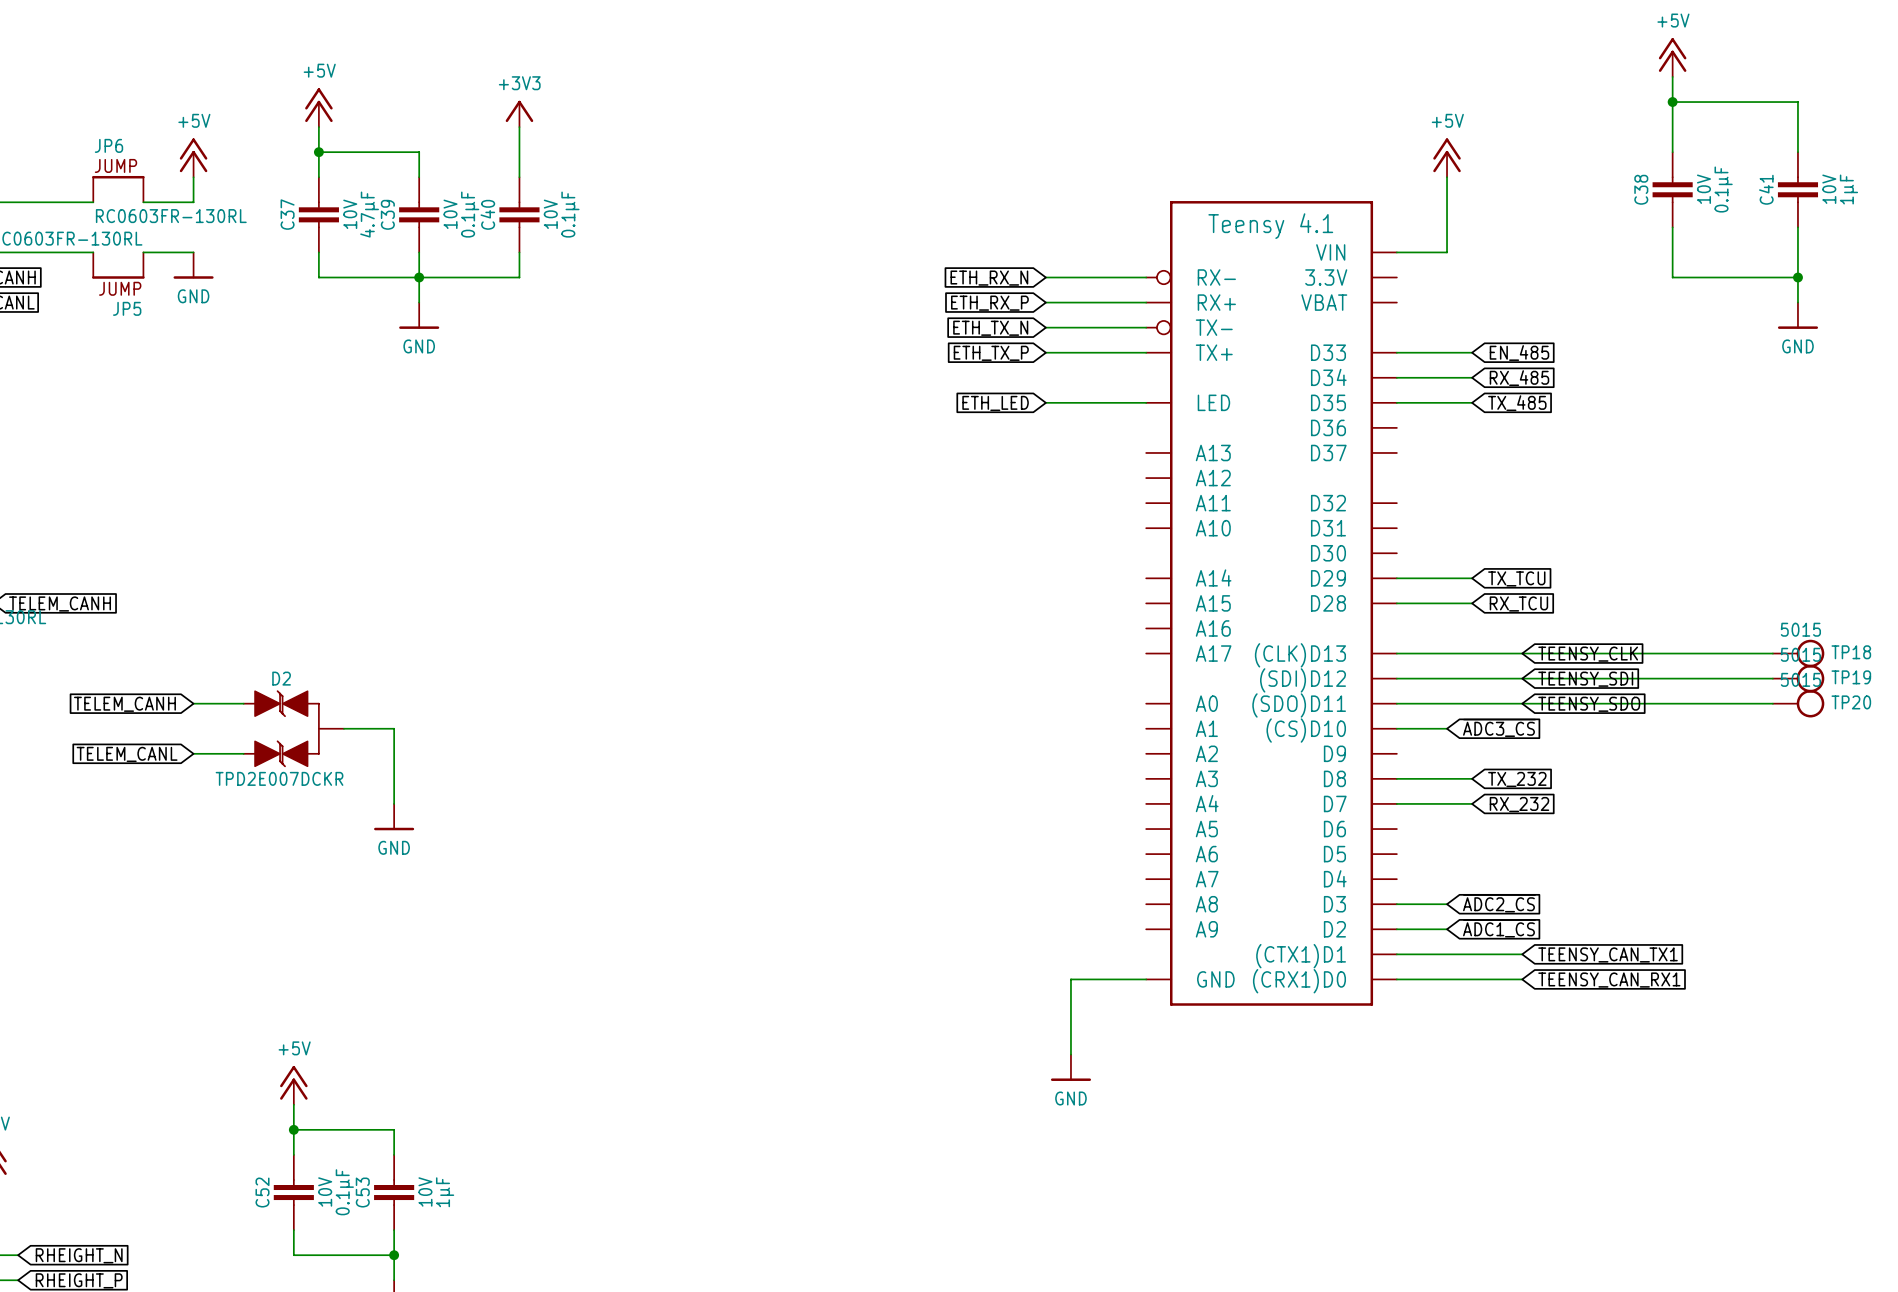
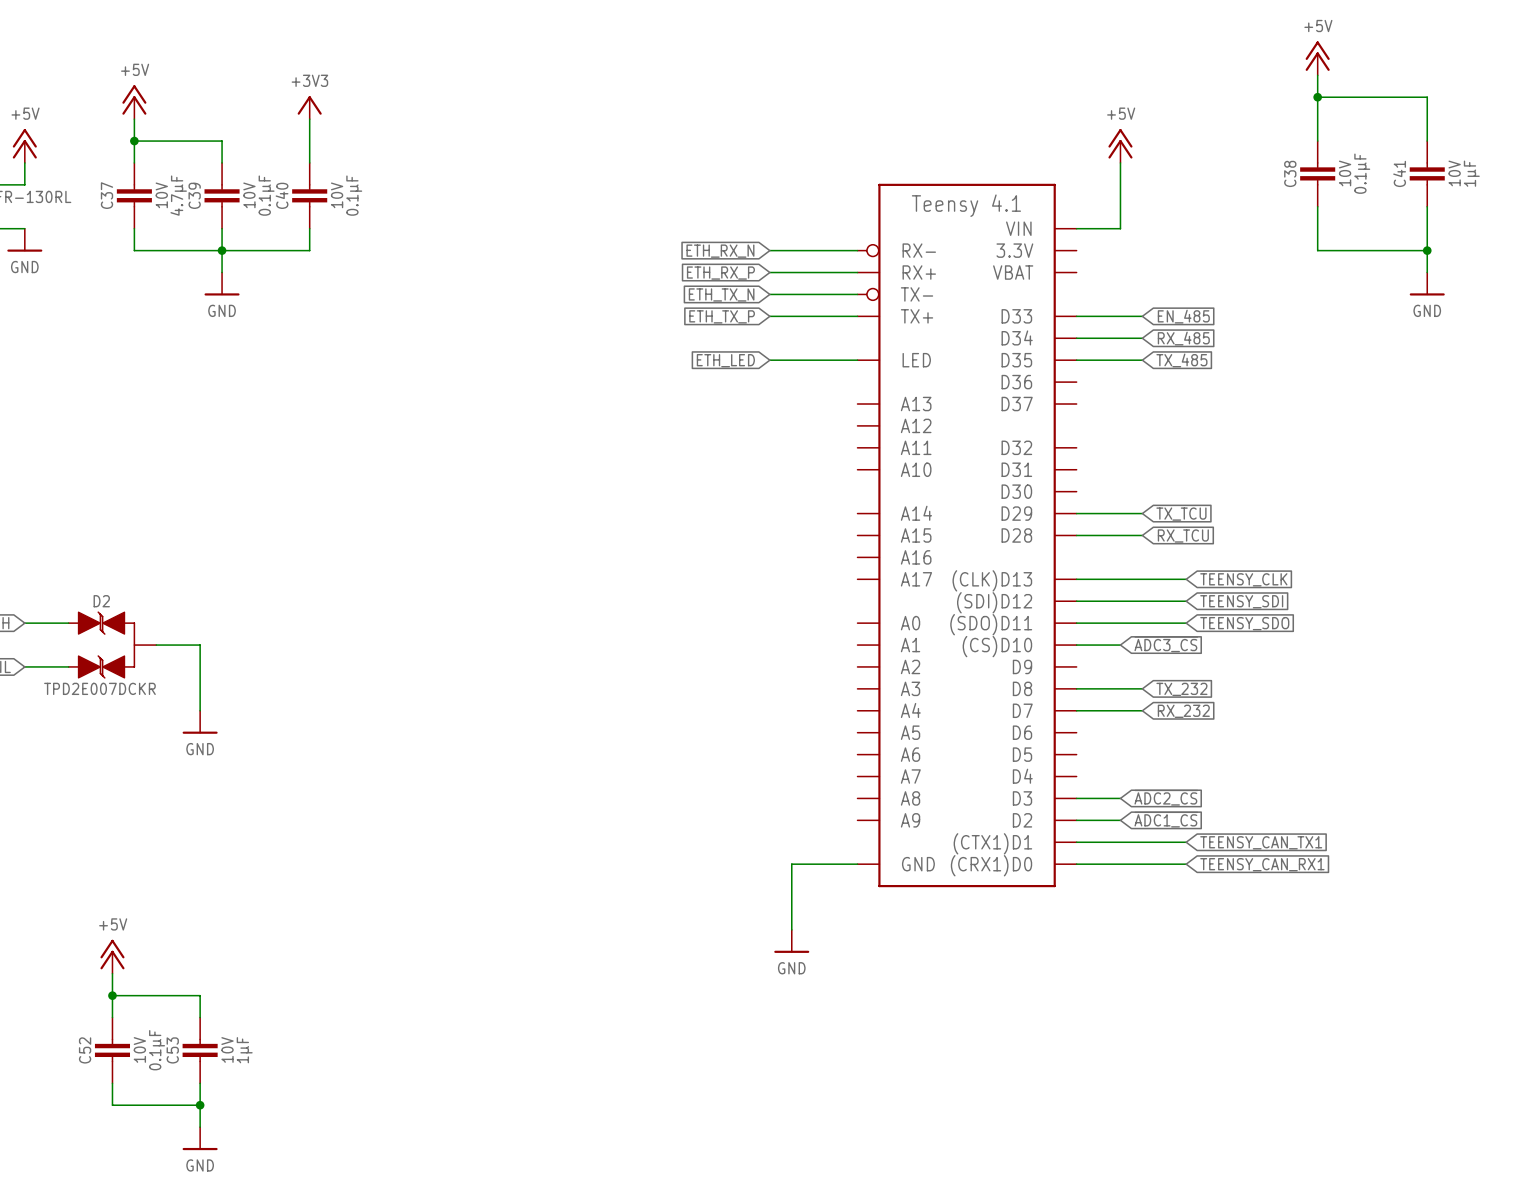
wire: (1522, 653) (1772, 653) -> none
TP18: (1798, 653) -> none
wire: (1522, 678) (1772, 678) -> none
TP19: (1798, 678) -> none
wire: (1522, 703) (1772, 703) -> none
TP20: (1798, 703) -> none

